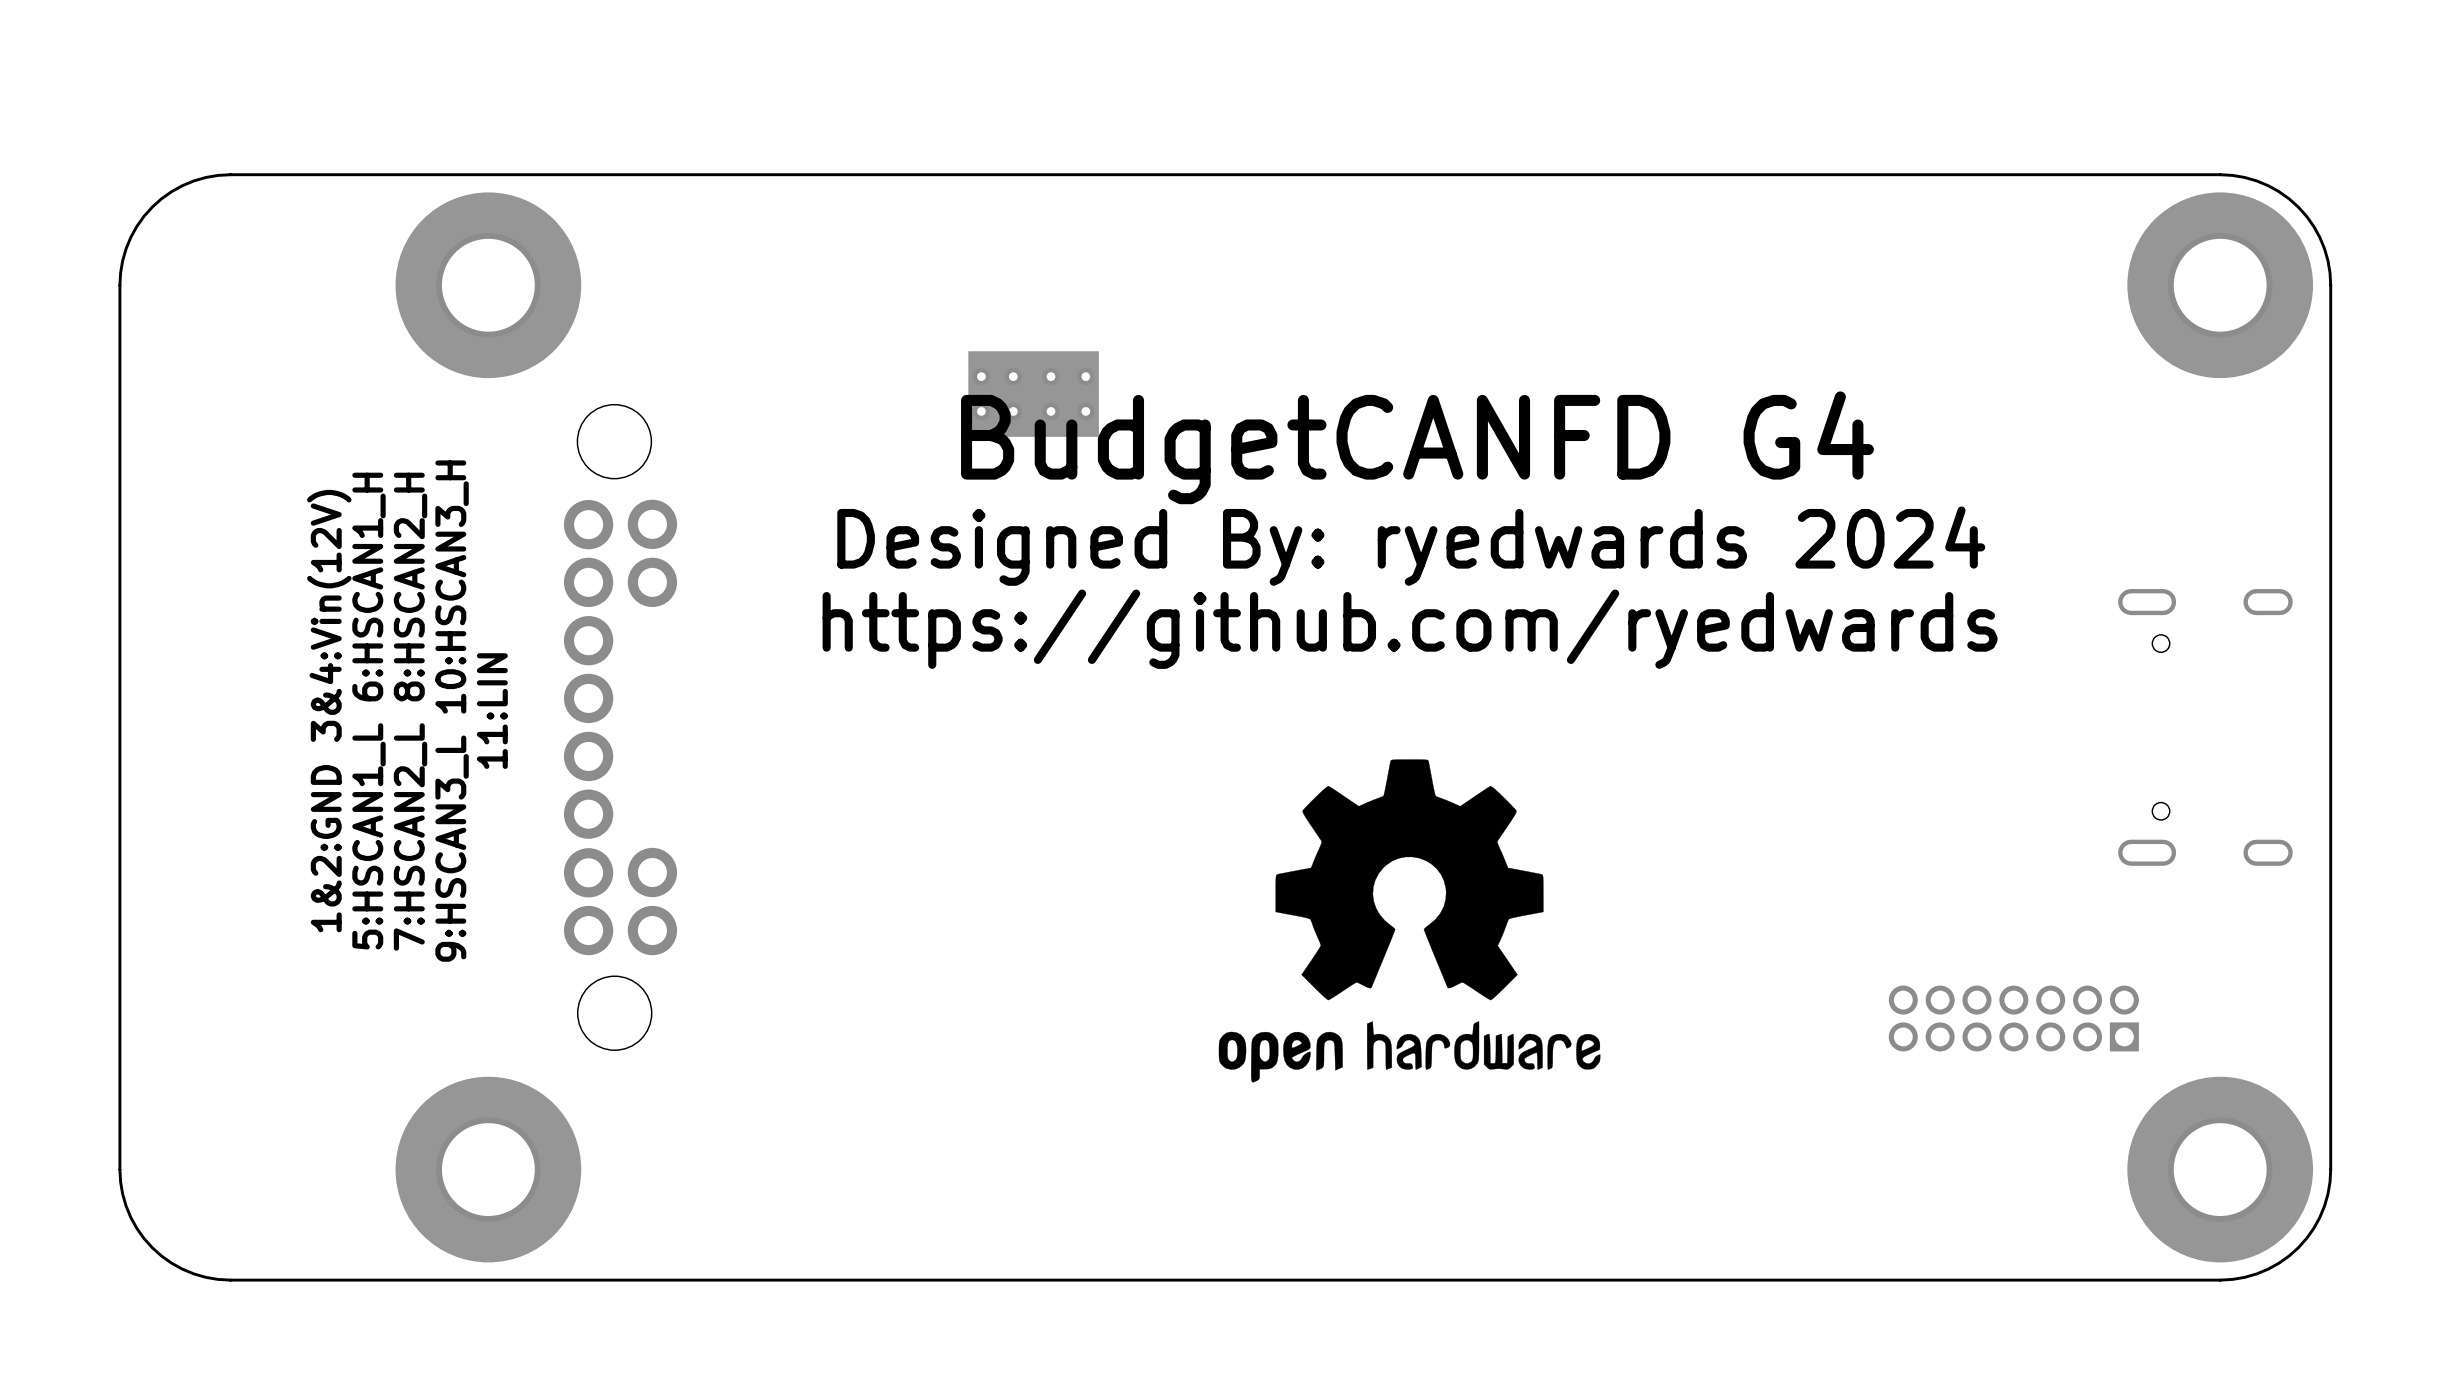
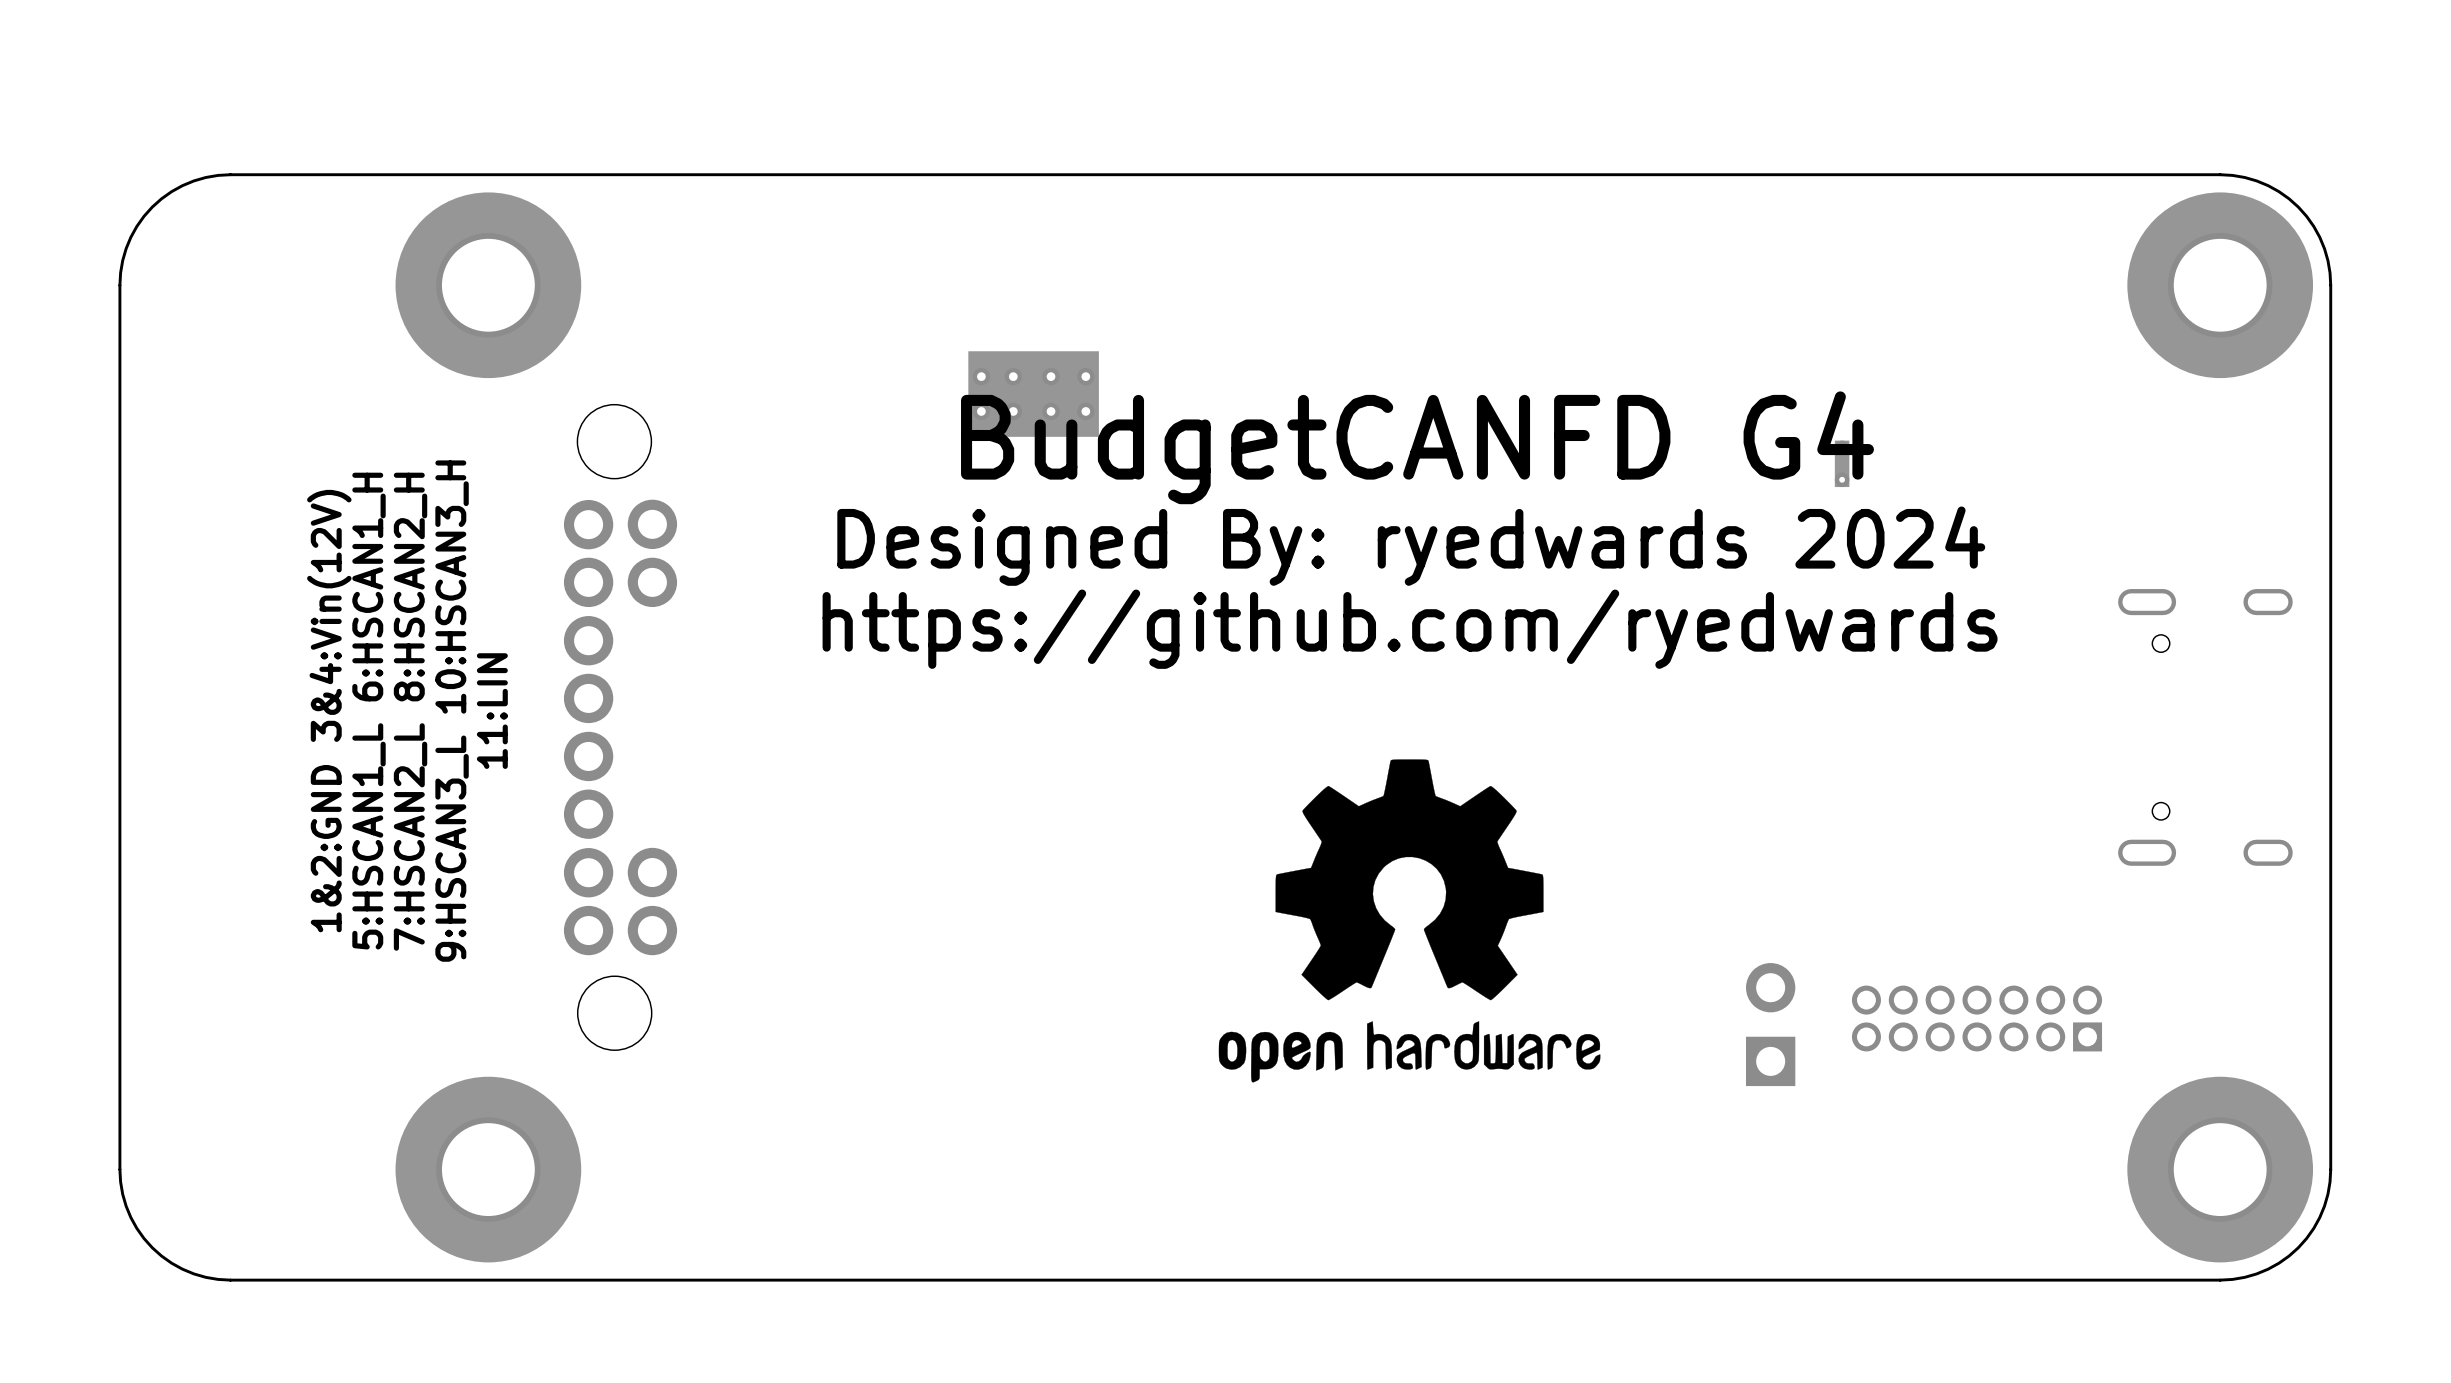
part: none -> (1842, 463)
part position: (2013, 1018) -> (1977, 1018)
part: none -> (1770, 1024)

